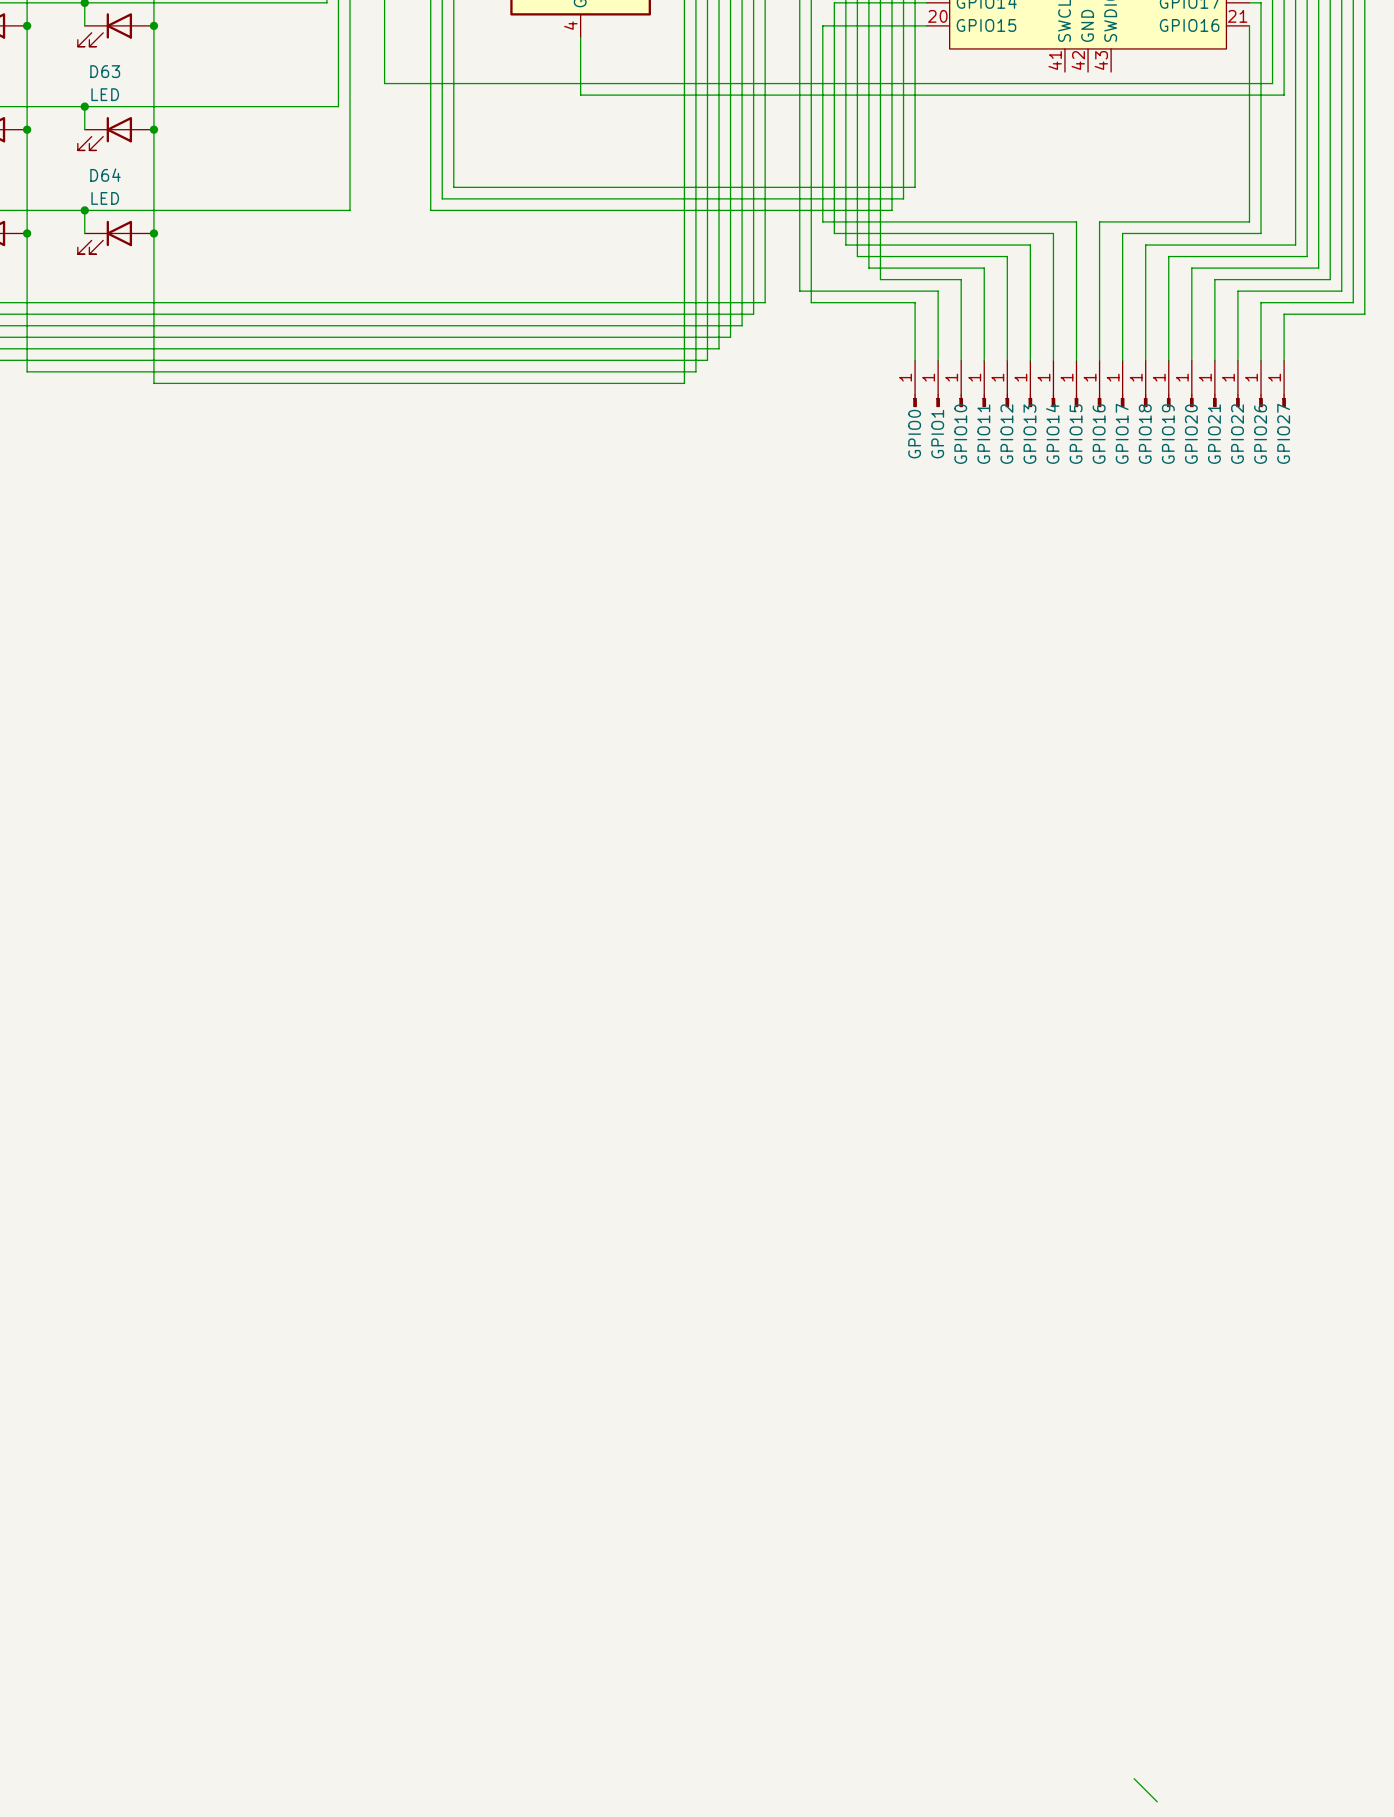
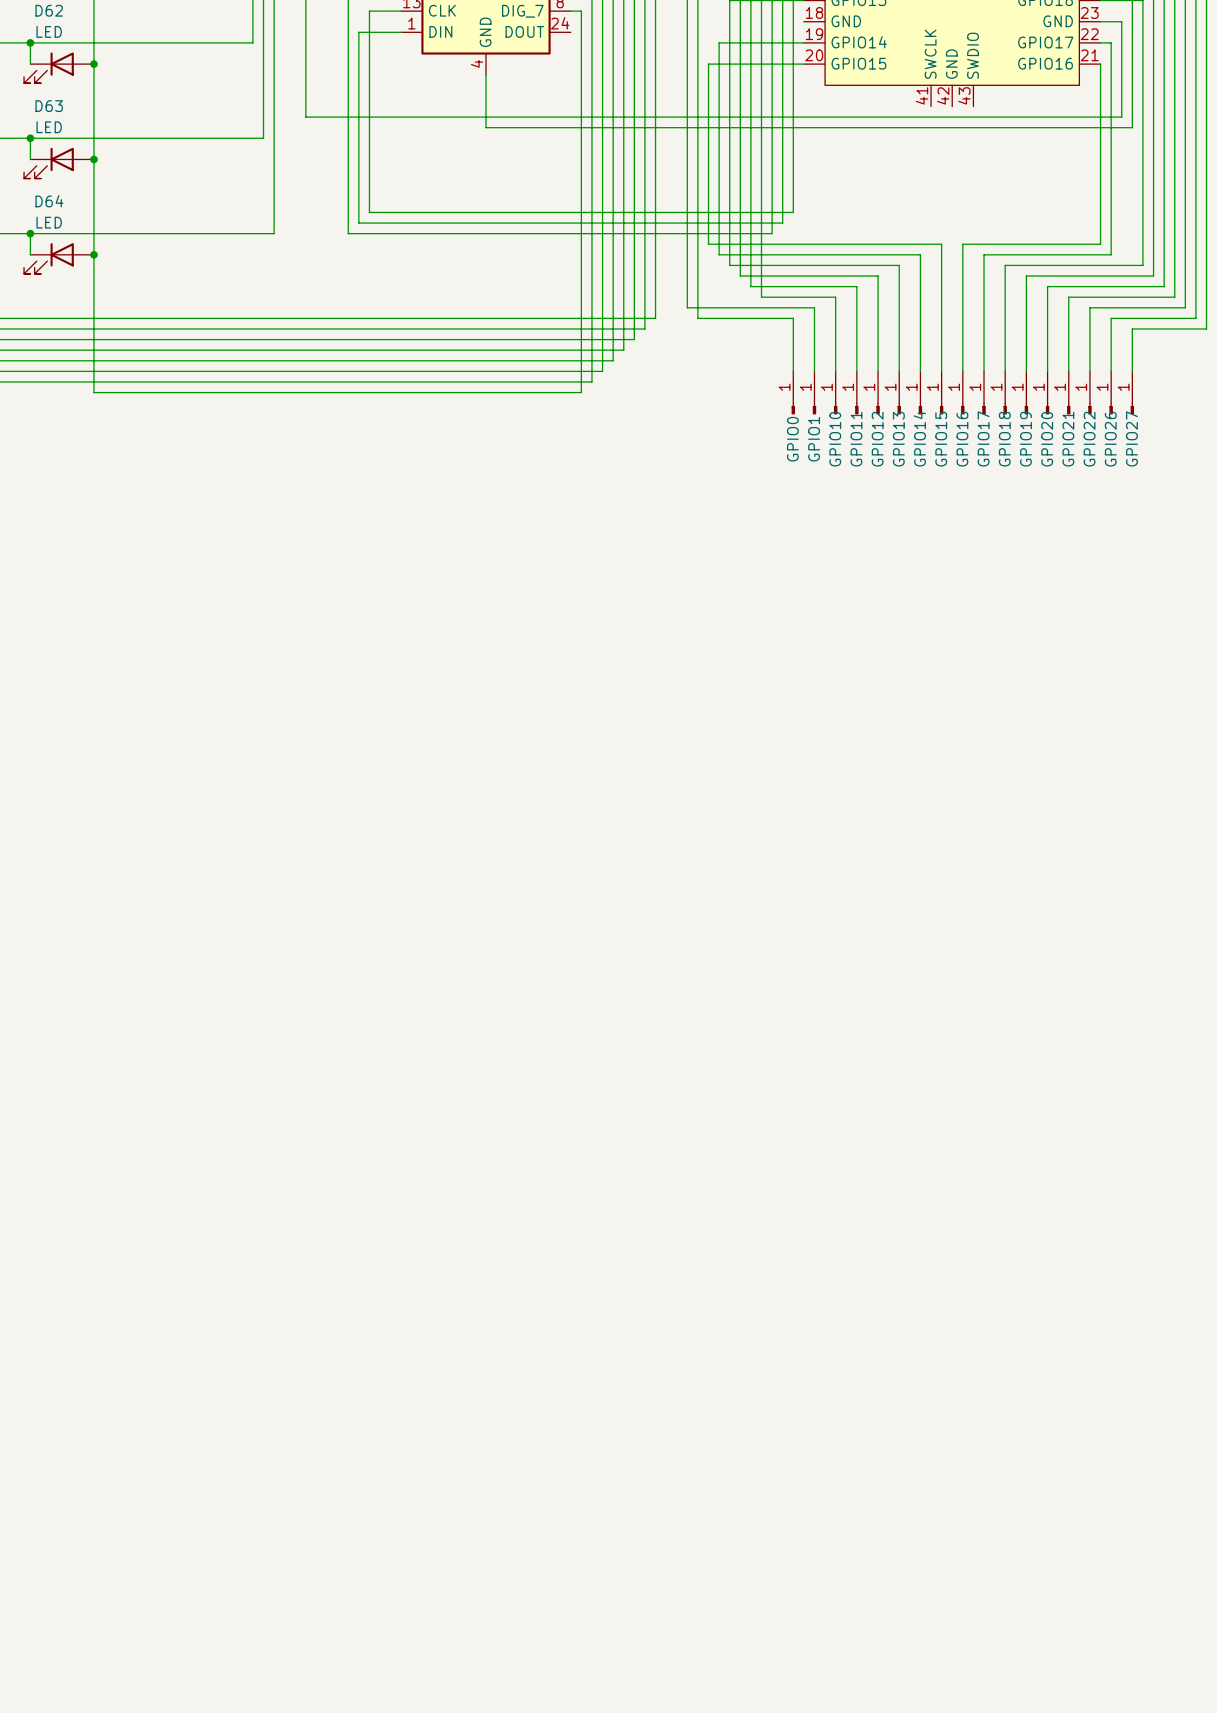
wire: (1134, 1778) (1157, 1801) -> none

